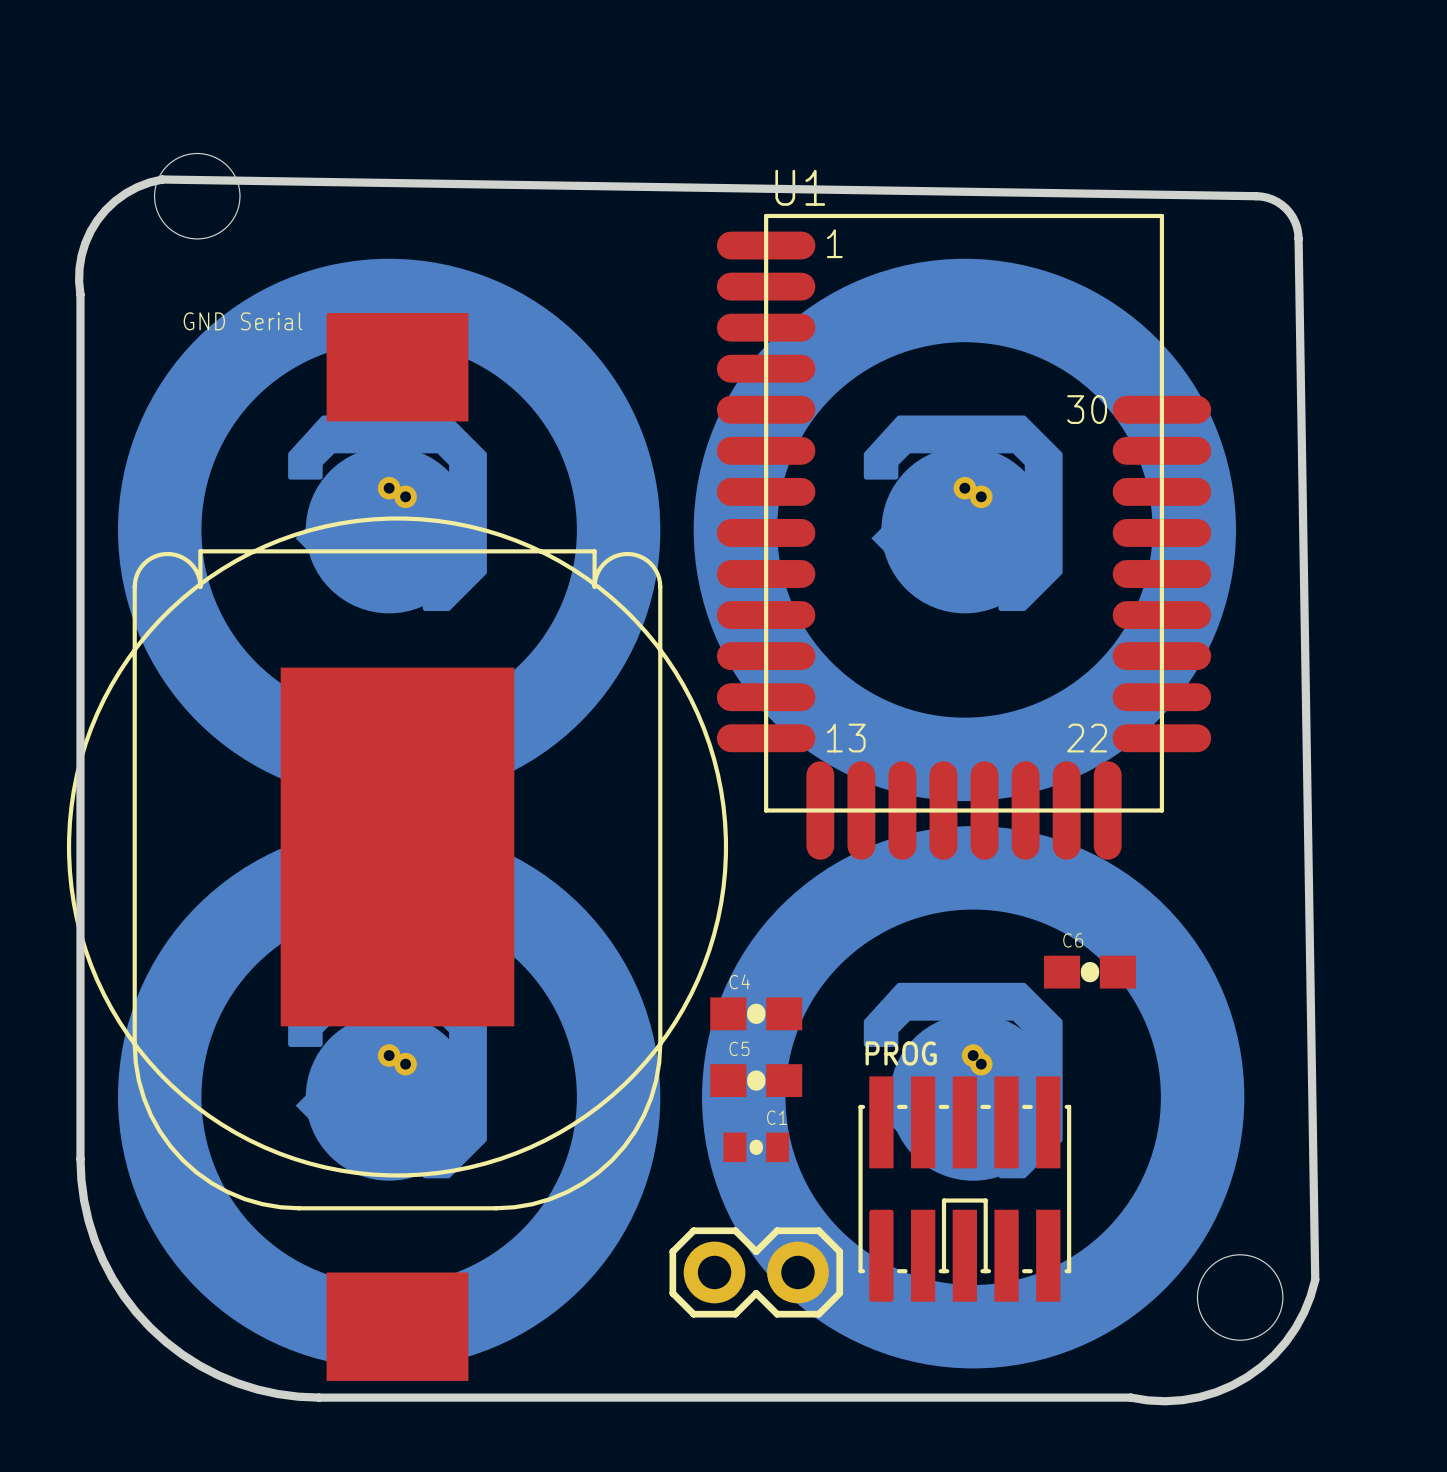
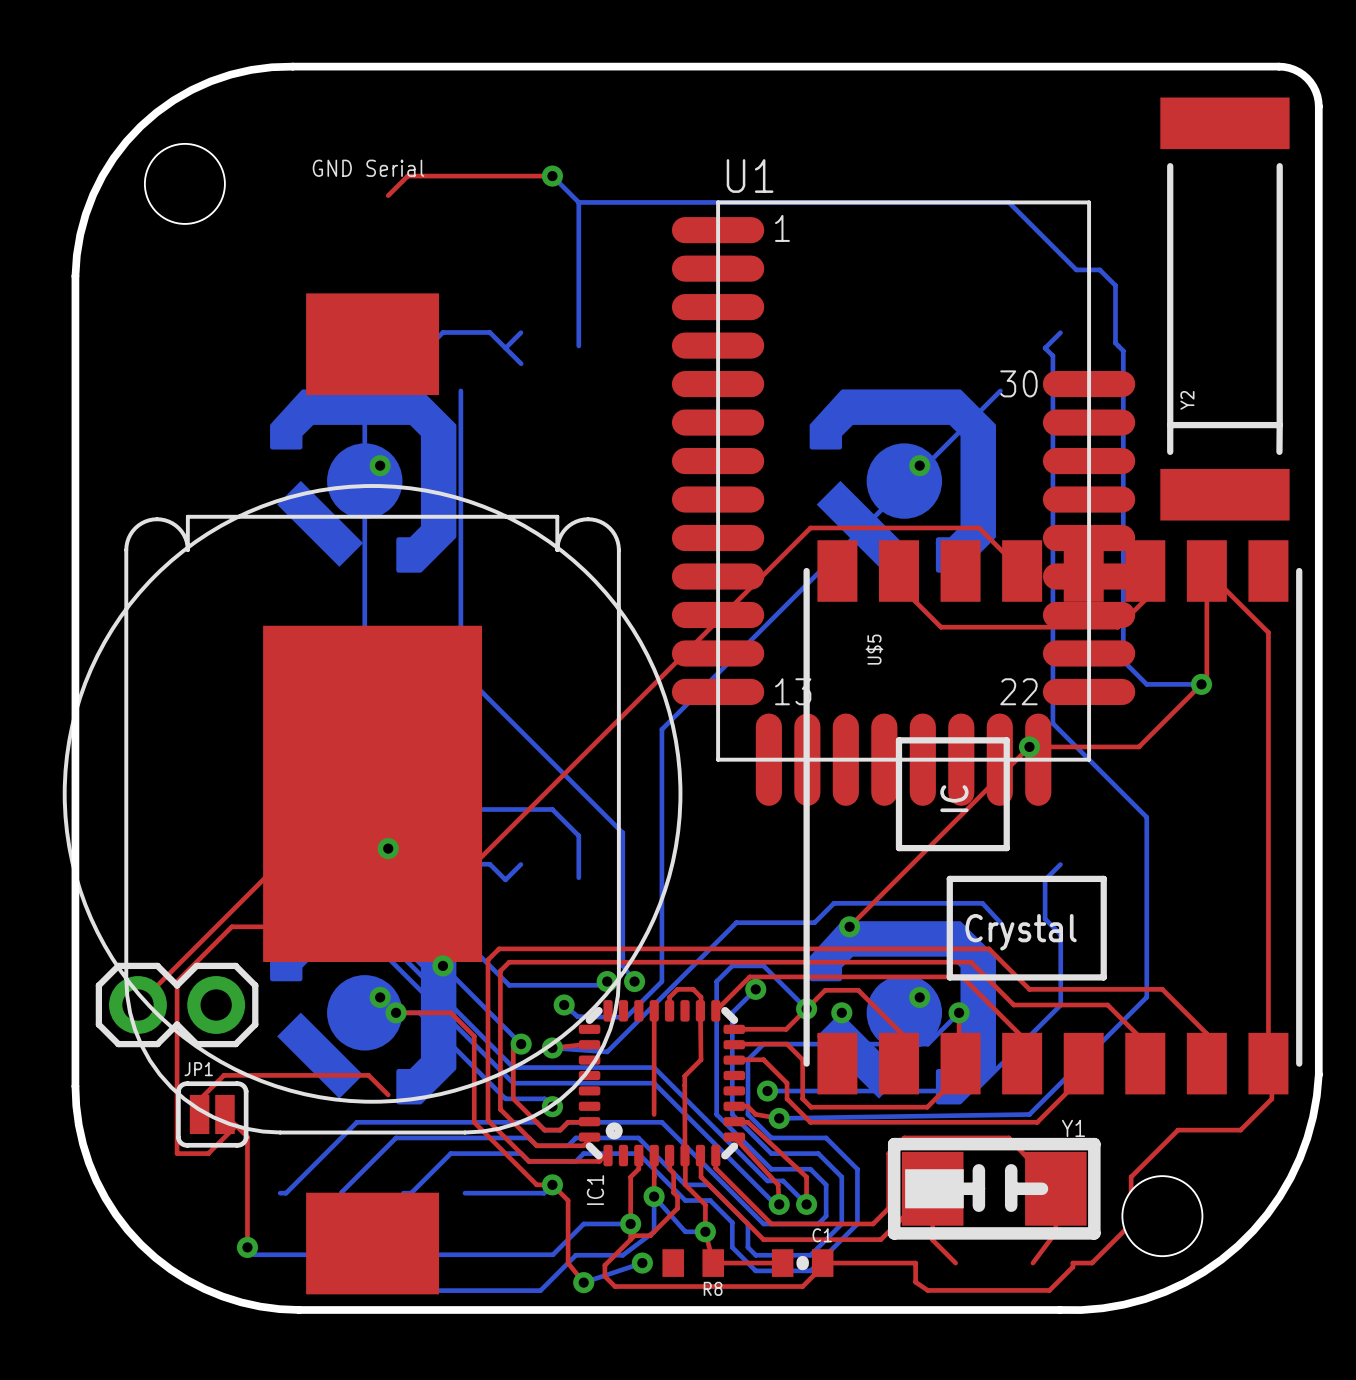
top track: none -> (552, 176) (407, 176) (388, 195)
bottom track: none -> (552, 176) (578, 202)
via: none -> (552, 176)
bottom track: none -> (578, 202) (1008, 202) (1076, 269) (1099, 269) (1115, 285) (1115, 343) (1123, 350) (1123, 660) (1146, 684) (1201, 684)
bottom track: none -> (578, 202) (578, 345)
board edge: (80, 294) (79, 281) (81, 255) (85, 243) (97, 220) (115, 201) (125, 193) (137, 187) (162, 179) (1256, 196) (1272, 199) (1286, 208) (1295, 222) (1298, 238) (1315, 1279) (1304, 1312) (1295, 1327) (1274, 1355) (1247, 1376) (1216, 1392) (1182, 1400) (1147, 1400) (1130, 1397) -> (75, 276) (80, 234) (93, 194) (102, 176) (126, 141) (156, 112) (191, 89) (230, 74) (251, 69) (292, 66) (1278, 66) (1294, 69) (1307, 78) (1315, 91) (1318, 106) (1318, 1074) (1313, 1117) (1299, 1158) (1279, 1196) (1253, 1230) (1221, 1259) (1185, 1282) (1145, 1299) (1102, 1308) (1059, 1309)
text position: GND Serial (242, 321) -> GND Serial (368, 168)
Y2: none -> (1224, 309)
bottom track: none -> (520, 332) (505, 348)
bottom track: none -> (1060, 332) (1045, 348) (1052, 355) (1052, 723) (1146, 817) (1146, 997) (1029, 1114) (779, 1118)
bottom track: none -> (521, 363) (489, 332) (442, 332) (364, 410) (364, 934) (513, 1083) (654, 1083) (771, 1200) (779, 1204)
bottom track: none -> (460, 390) (460, 671) (622, 832) (622, 965) (634, 981)
bottom track: none -> (1000, 390) (661, 729) (661, 981) (626, 1017) (577, 1016) (564, 1005)
part: (389, 529) -> none
part: (964, 529) -> none
top track: none -> (898, 571) (904, 576) (904, 590) (940, 627) (1117, 627) (1145, 599) (1145, 571)
top track: none -> (1022, 571) (979, 527) (810, 527) (411, 926) (231, 926) (177, 981) (177, 1153) (208, 1153) (236, 1125)
via: none -> (1201, 684)
via: none -> (1029, 746)
U$5: none -> (1052, 817)
top track: none -> (388, 848) (294, 848) (137, 1005)
bottom track: none -> (388, 848) (427, 809) (552, 809) (578, 835) (578, 877)
via: none -> (388, 848)
bottom track: none -> (520, 864) (505, 879) (489, 864) (411, 864) (380, 895) (380, 934) (513, 1067) (654, 1067) (767, 1180) (783, 1180) (806, 1204)
bottom track: none -> (1060, 864) (1045, 879) (1045, 918) (1060, 934) (1060, 1005) (974, 1091) (767, 1091)
C6: (1089, 972) -> none
bottom track: none -> (460, 922) (460, 936) (509, 985) (603, 985) (607, 981)
bottom track: none -> (1000, 922) (982, 903) (833, 903) (814, 922) (736, 922) (607, 1051) (552, 1048)
top track: none -> (849, 926) (1029, 746) (1138, 746) (1206, 679) (1206, 571) (1268, 632) (1268, 1063) (1271, 1067) (1271, 1098) (1240, 1130) (1178, 1130) (1131, 1177) (1131, 1223) (1092, 1263) (1072, 1263) (1072, 1266) (1049, 1290) (927, 1290) (915, 1282) (915, 1263) (822, 1263) (822, 1266) (802, 1286) (615, 1286) (604, 1276) (604, 1265) (634, 1235) (650, 1235) (677, 1208) (677, 1196) (673, 1192) (673, 1173) (669, 1169) (669, 1155)
via: none -> (849, 926)
C4: (756, 1013) -> none
bottom track: none -> (442, 965) (521, 1044)
via: none -> (442, 965)
via: none -> (607, 981)
via: none -> (634, 981)
bottom track: none -> (755, 989) (732, 1012) (732, 1114) (771, 1153) (818, 1153) (841, 1177) (841, 1223) (810, 1255) (755, 1255) (747, 1247) (747, 1223) (708, 1184) (685, 1184) (638, 1137) (575, 1137) (568, 1145) (536, 1145) (528, 1137) (396, 1137) (341, 1193)
via: none -> (755, 989)
via: none -> (564, 1005)
bottom track: none -> (806, 1008) (763, 965) (732, 965) (716, 981) (716, 1114) (771, 1169) (810, 1169) (826, 1184) (826, 1216) (818, 1223) (763, 1223) (661, 1122) (568, 1122) (560, 1130) (544, 1130) (536, 1122) (356, 1122) (286, 1193) (280, 1193)
via: none -> (806, 1008)
top track: none -> (654, 1010) (654, 1114)
top track: none -> (669, 1010) (669, 997) (677, 989) (693, 989) (701, 997) (701, 1059) (684, 1076) (685, 1155)
top track: none -> (715, 1010) (749, 976) (962, 976) (1022, 1036) (1022, 1063)
top track: none -> (396, 1012) (450, 1012) (474, 1036) (474, 1122) (536, 1184) (552, 1184) (568, 1200) (568, 1263) (583, 1282)
bottom track: none -> (396, 1012) (419, 1012) (505, 1098) (544, 1098) (552, 1106)
via: none -> (396, 1012)
C5: (756, 1080) -> none
via: none -> (841, 1012)
top track: none -> (959, 1012) (960, 1073) (927, 1107) (811, 1107) (802, 1098) (802, 1059) (787, 1044) (734, 1044)
bottom track: none -> (959, 1012) (927, 1044) (763, 1044) (747, 1059) (747, 1114) (771, 1137) (826, 1137) (857, 1169) (857, 1223) (810, 1270) (755, 1270) (732, 1247) (732, 1222) (710, 1200) (685, 1200) (638, 1153) (583, 1153) (575, 1161) (528, 1161) (521, 1153) (450, 1153) (411, 1193) (403, 1193)
via: none -> (959, 1012)
part: (389, 1097) -> none
part: (973, 1097) -> none
top track: none -> (734, 1029) (786, 1029) (825, 990) (858, 990) (904, 1036) (904, 1059) (896, 1067) (898, 1063)
top track: none -> (521, 1044) (513, 1044) (513, 1098) (544, 1130) (560, 1130) (568, 1122) (589, 1121)
via: none -> (521, 1044)
top track: none -> (589, 1044) (552, 1048)
via: none -> (552, 1048)
top track: none -> (734, 1059) (763, 1059) (787, 1083) (787, 1098) (810, 1122) (1037, 1122) (1083, 1075) (1083, 1063)
top track: none -> (1145, 1063) (1145, 1042) (1107, 1005) (1013, 1005) (971, 962) (509, 962) (500, 971) (500, 1109) (536, 1145) (583, 1145) (591, 1137) (589, 1137)
top track: none -> (1206, 1063) (1206, 1033) (1162, 989) (1029, 989) (988, 948) (499, 948) (488, 959) (488, 1120) (528, 1161) (599, 1161) (606, 1153) (608, 1155)
C1 position: (756, 1147) -> (802, 1263)
IC1: none -> (661, 1083)
via: none -> (767, 1091)
top track: none -> (388, 1094) (368, 1075) (224, 1075) (199, 1099) (199, 1114)
via: none -> (552, 1106)
top track: none -> (734, 1106) (747, 1106) (755, 1114) (779, 1118)
JP1: none -> (212, 1114)
top track: none -> (224, 1114) (247, 1136) (247, 1247)
PROG: (964, 1189) -> none
via: none -> (779, 1118)
top track: none -> (734, 1121) (747, 1122) (806, 1177) (806, 1204)
top track: none -> (734, 1137) (778, 1184) (779, 1204)
top track: none -> (638, 1155) (638, 1168) (630, 1177) (630, 1239)
top track: none -> (654, 1155) (654, 1196)
top track: none -> (700, 1155) (701, 1177) (763, 1239) (880, 1239) (932, 1188) (932, 1240) (955, 1263)
top track: none -> (715, 1155) (715, 1168) (771, 1223) (873, 1223) (888, 1208) (888, 1153) (904, 1137) (1008, 1137) (1055, 1188) (1055, 1232) (1032, 1263)
top track: none -> (685, 1155) (685, 1184) (705, 1204) (705, 1231) (713, 1263) (782, 1263)
bottom track: none -> (552, 1184) (544, 1193) (464, 1193)
via: none -> (552, 1184)
Y1: none -> (994, 1188)
part position: (756, 1272) -> (177, 1005)
via: none -> (654, 1196)
via: none -> (779, 1204)
via: none -> (806, 1204)
bottom track: none -> (630, 1223) (583, 1223) (552, 1254) (434, 1254)
via: none -> (630, 1223)
bottom track: none -> (705, 1231) (685, 1231) (654, 1196) (654, 1231) (622, 1255) (575, 1255) (540, 1290) (346, 1290) (311, 1254) (254, 1254) (247, 1247)
via: none -> (705, 1231)
via: none -> (247, 1247)
bottom track: none -> (642, 1263) (583, 1282)
via: none -> (642, 1263)
R8: none -> (693, 1263)
via: none -> (583, 1282)

